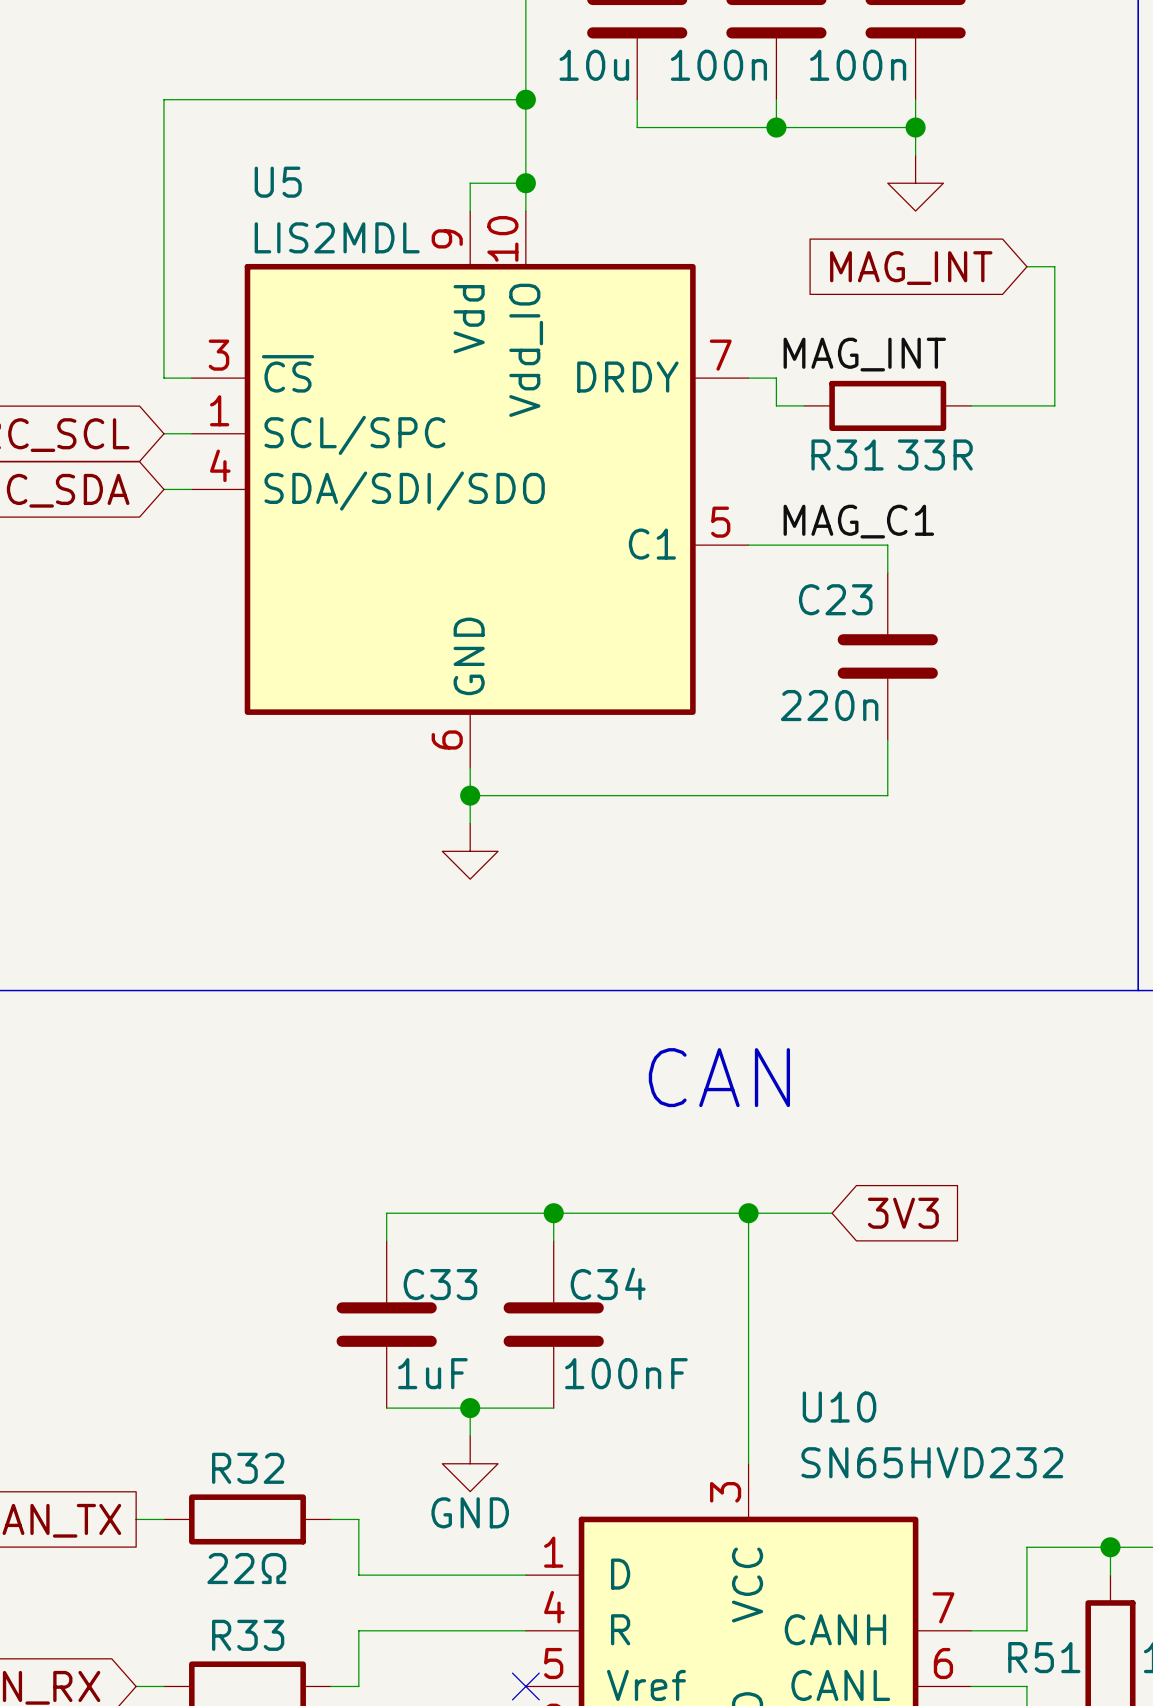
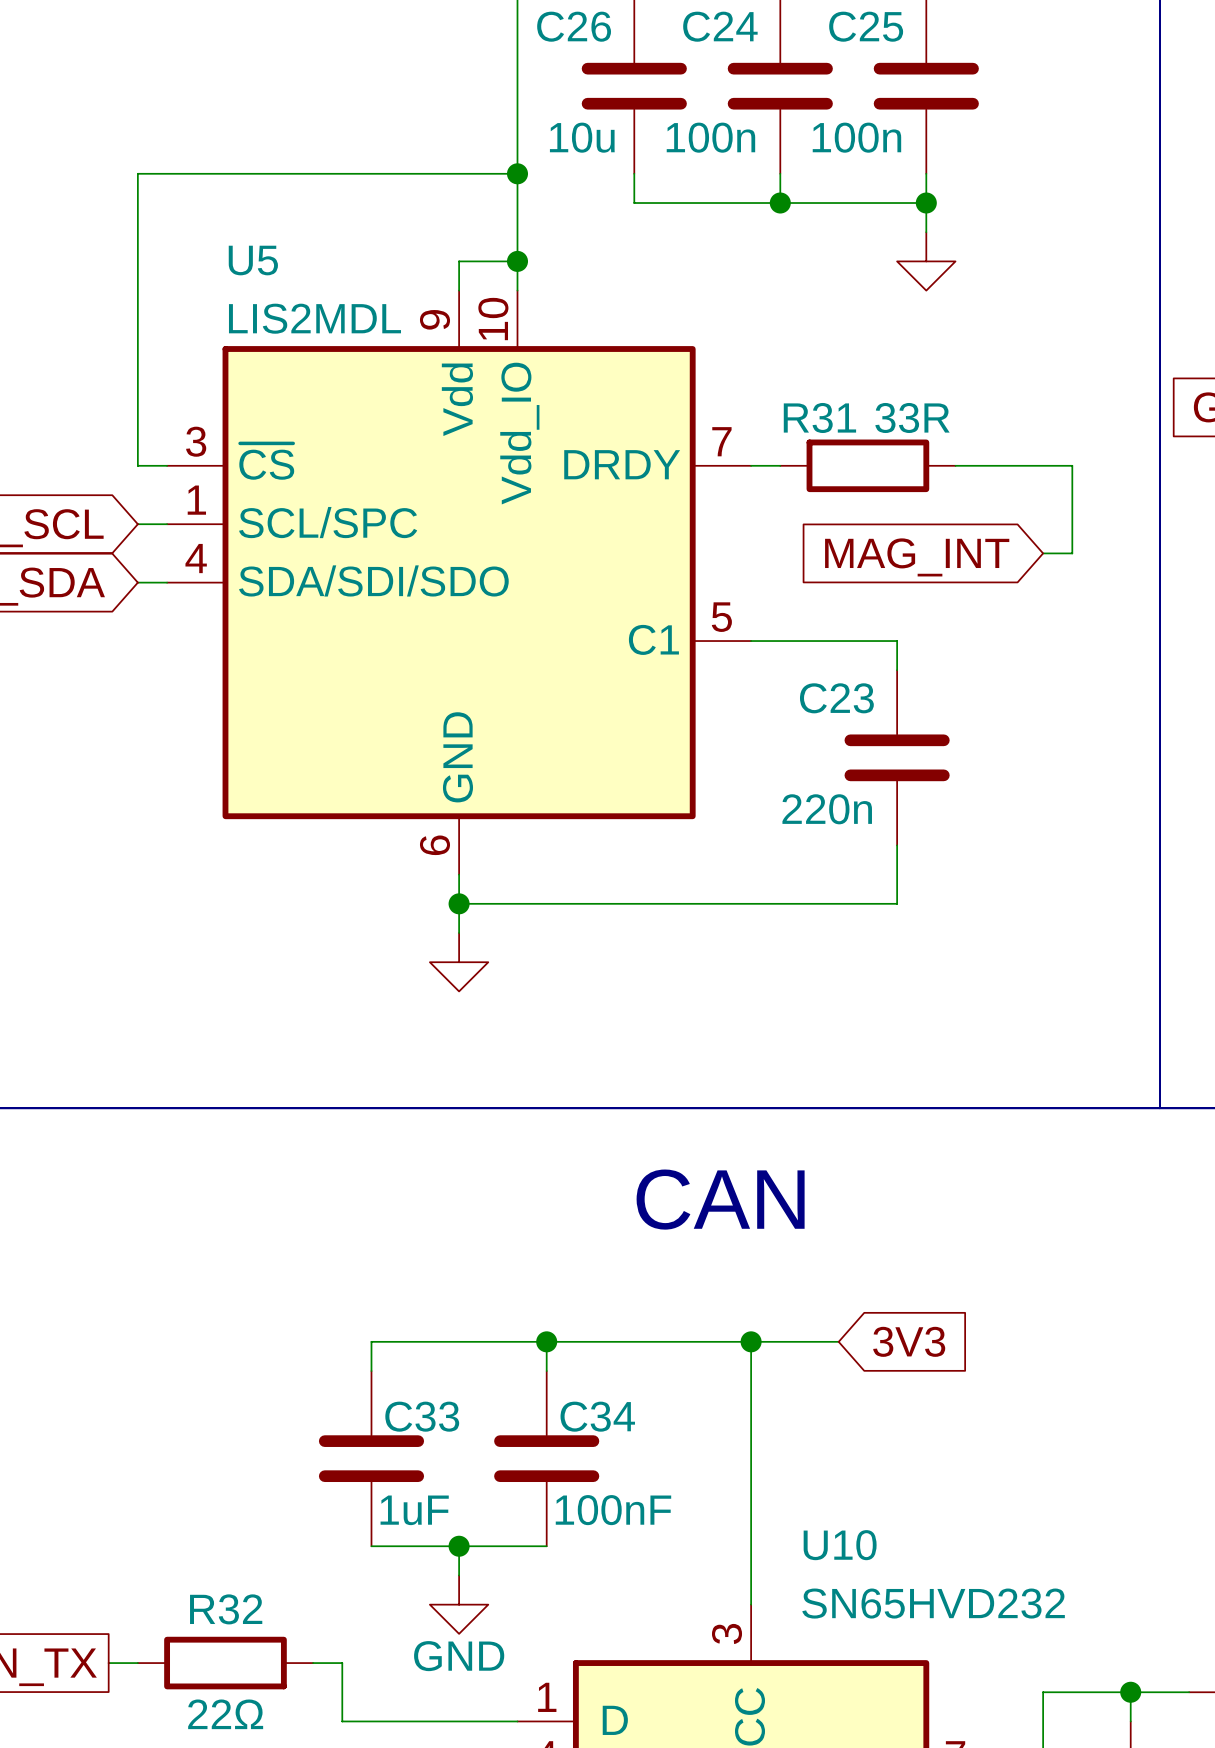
wire: (1026, 266) (1054, 266) (1054, 378) -> (955, 465) (1072, 465)
global label position: MAG_INT (911, 268) -> MAG_INT (917, 557)
label: MAG_INT (864, 354) -> none
wire: (776, 378) (776, 405) (804, 405) -> none
R31 position: (887, 405) -> (867, 465)
wire: (971, 405) (1054, 405) -> (1043, 553) (1072, 553) (1072, 495)
R31 name position: R31 (847, 454) -> R31 (819, 417)
R31 value position: 33R (935, 454) -> 33R (912, 417)
label: MAG_C1 (858, 521) -> none

